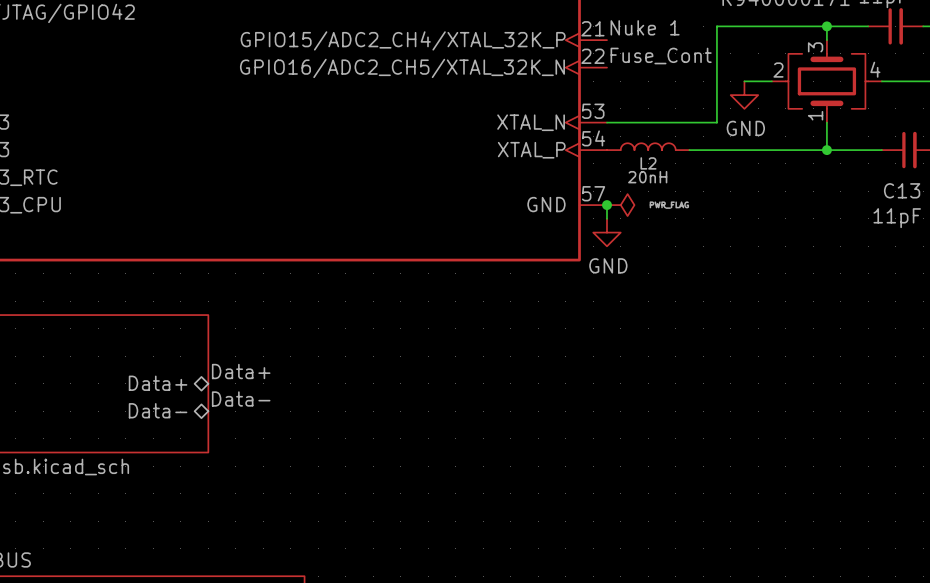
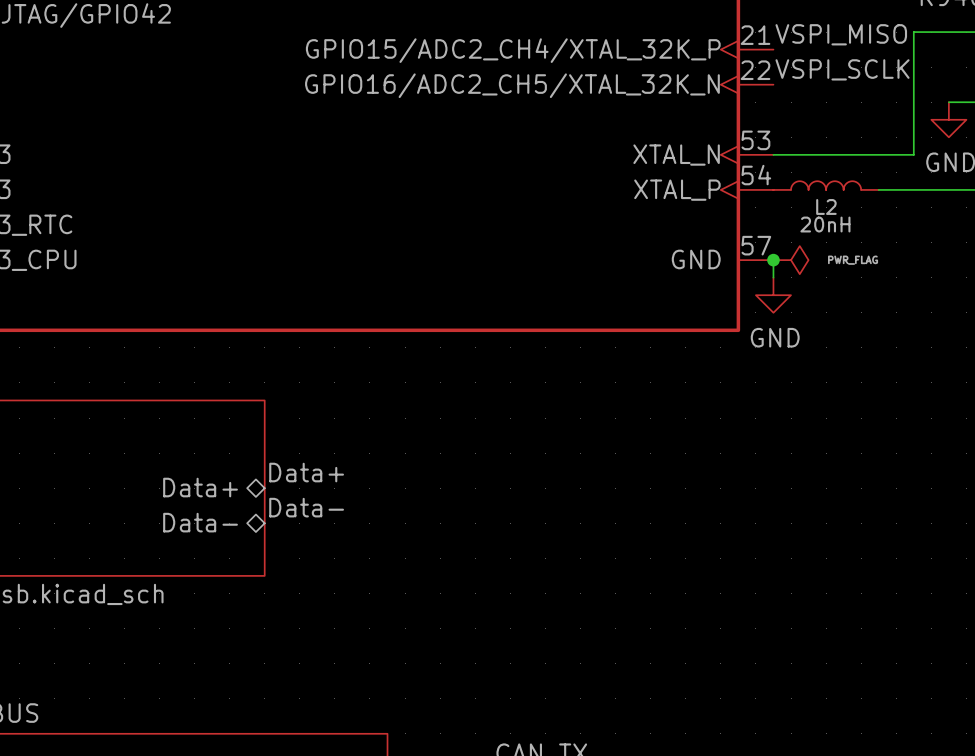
label: Nuke 1 (645, 27) -> VSPI_MISO (841, 34)
label: Fuse_Cont (661, 56) -> VSPI_SCLK (842, 69)

